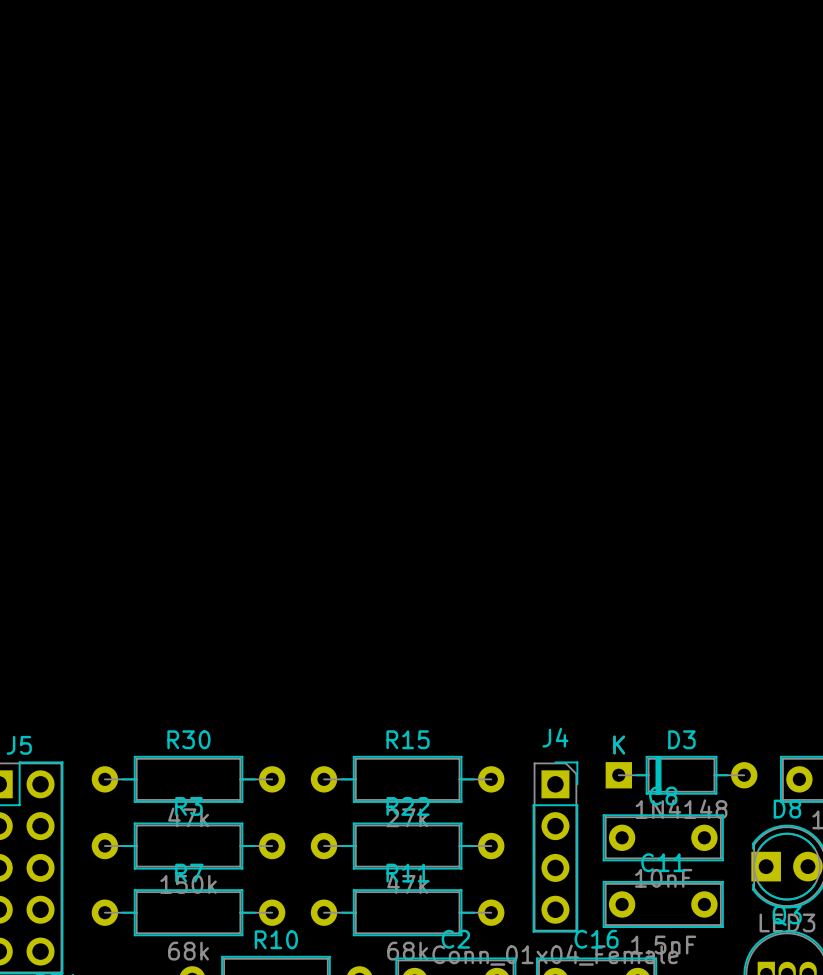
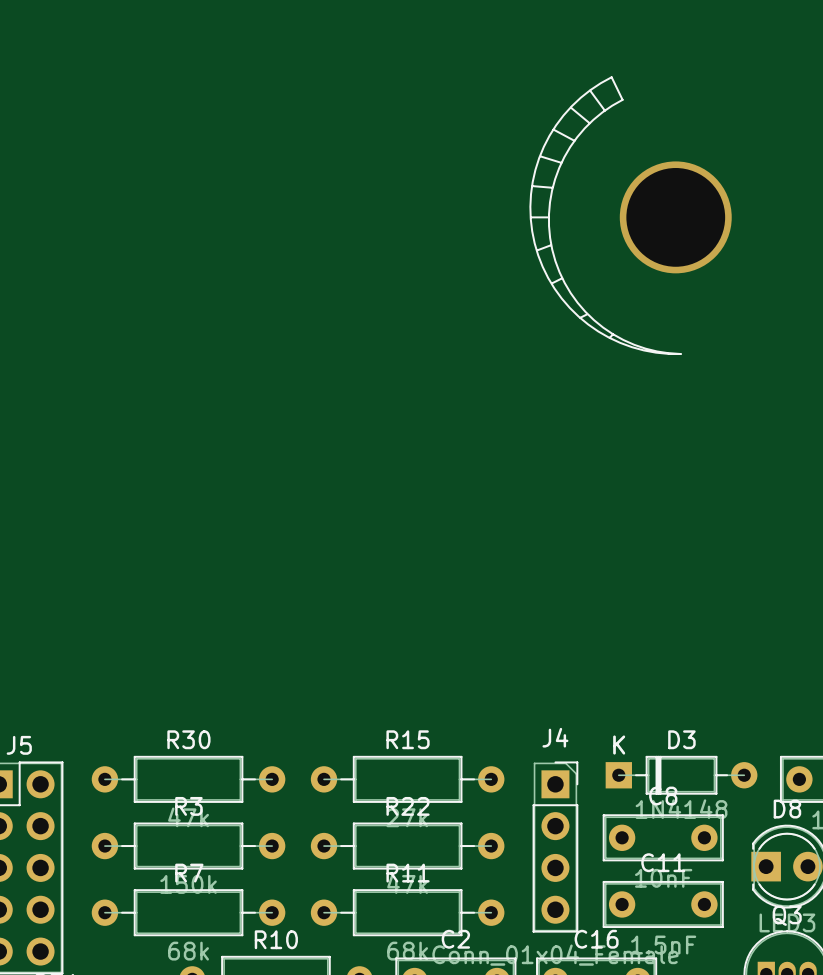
line: none -> (611, 77) (622, 99) (593, 119) (577, 137) (564, 157) (555, 179) (548, 214) (552, 249) (559, 272) (570, 293) (593, 320) (613, 334) (634, 344) (657, 351) (680, 354) (656, 352) (631, 347) (609, 337) (588, 324) (569, 307) (554, 288) (542, 266) (534, 243) (530, 219) (531, 194) (535, 170) (543, 146) (556, 125) (571, 106) (590, 90) (611, 77)
line: none -> (590, 90) (604, 110)
line: none -> (570, 107) (589, 123)
line: none -> (553, 129) (574, 140)
line: none -> (540, 156) (561, 162)
line: none -> (532, 186) (552, 187)
line: none -> (530, 217) (549, 217)
via: none -> (675, 217)
line: none -> (550, 245) (537, 250)
line: none -> (562, 278) (552, 283)
line: none -> (586, 314) (580, 317)
line: none -> (613, 334) (609, 337)

